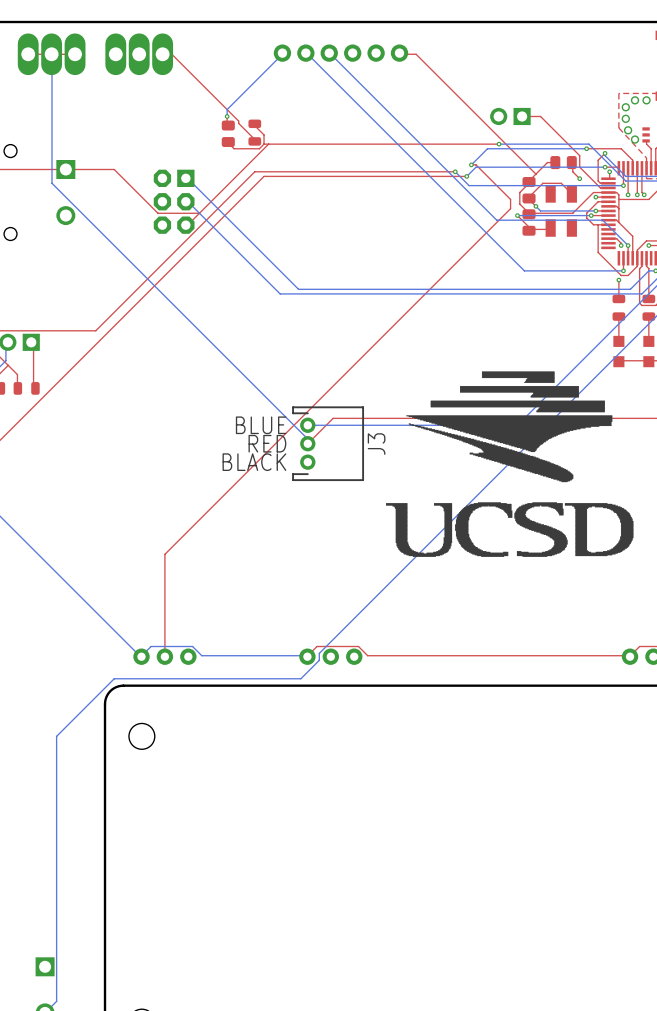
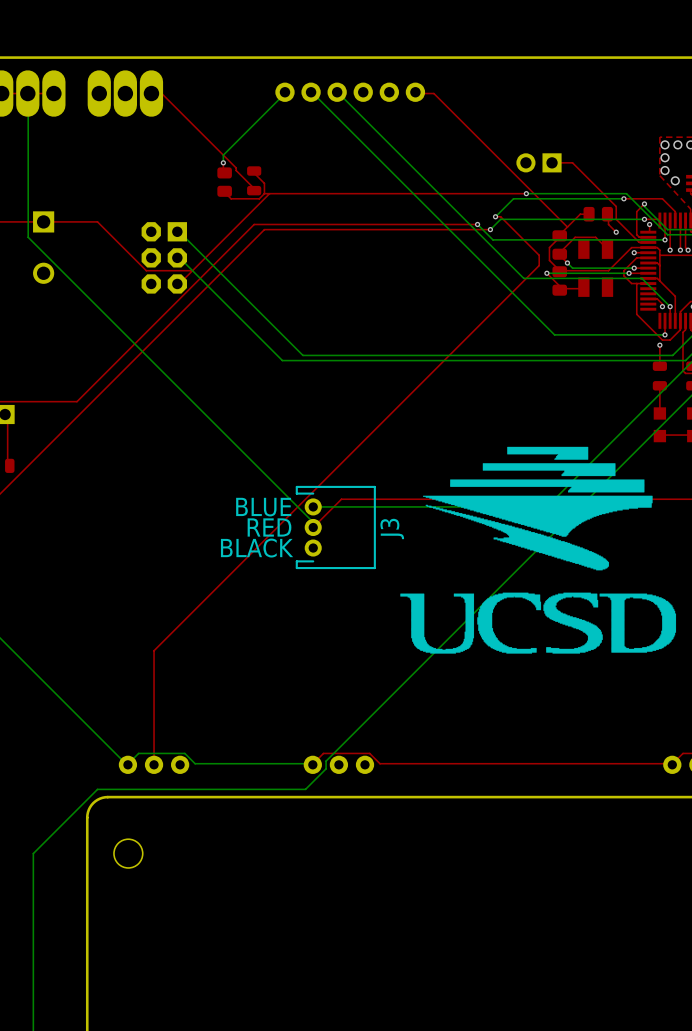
via: none -> (665, 144)
via: (625, 107) -> none
via: none -> (665, 157)
via: (625, 118) -> none
via: none -> (665, 170)
via: (628, 130) -> none
via: none -> (675, 180)
via: (635, 139) -> none

